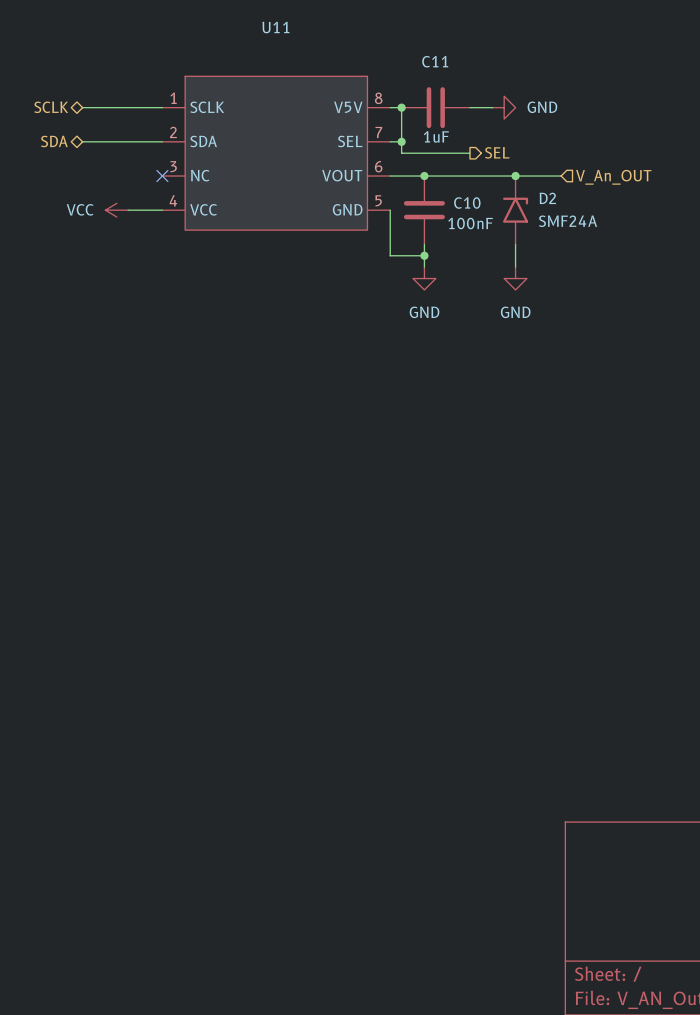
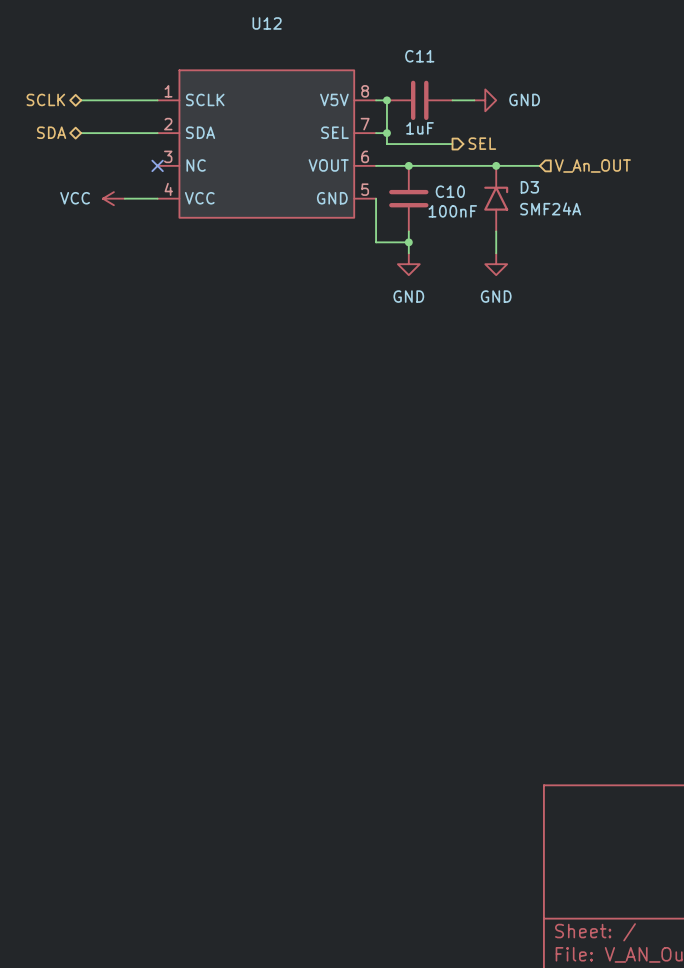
U11 name: U11 (275, 27) -> U12 (267, 23)
D2 name: D2 (547, 198) -> D3 (529, 187)

